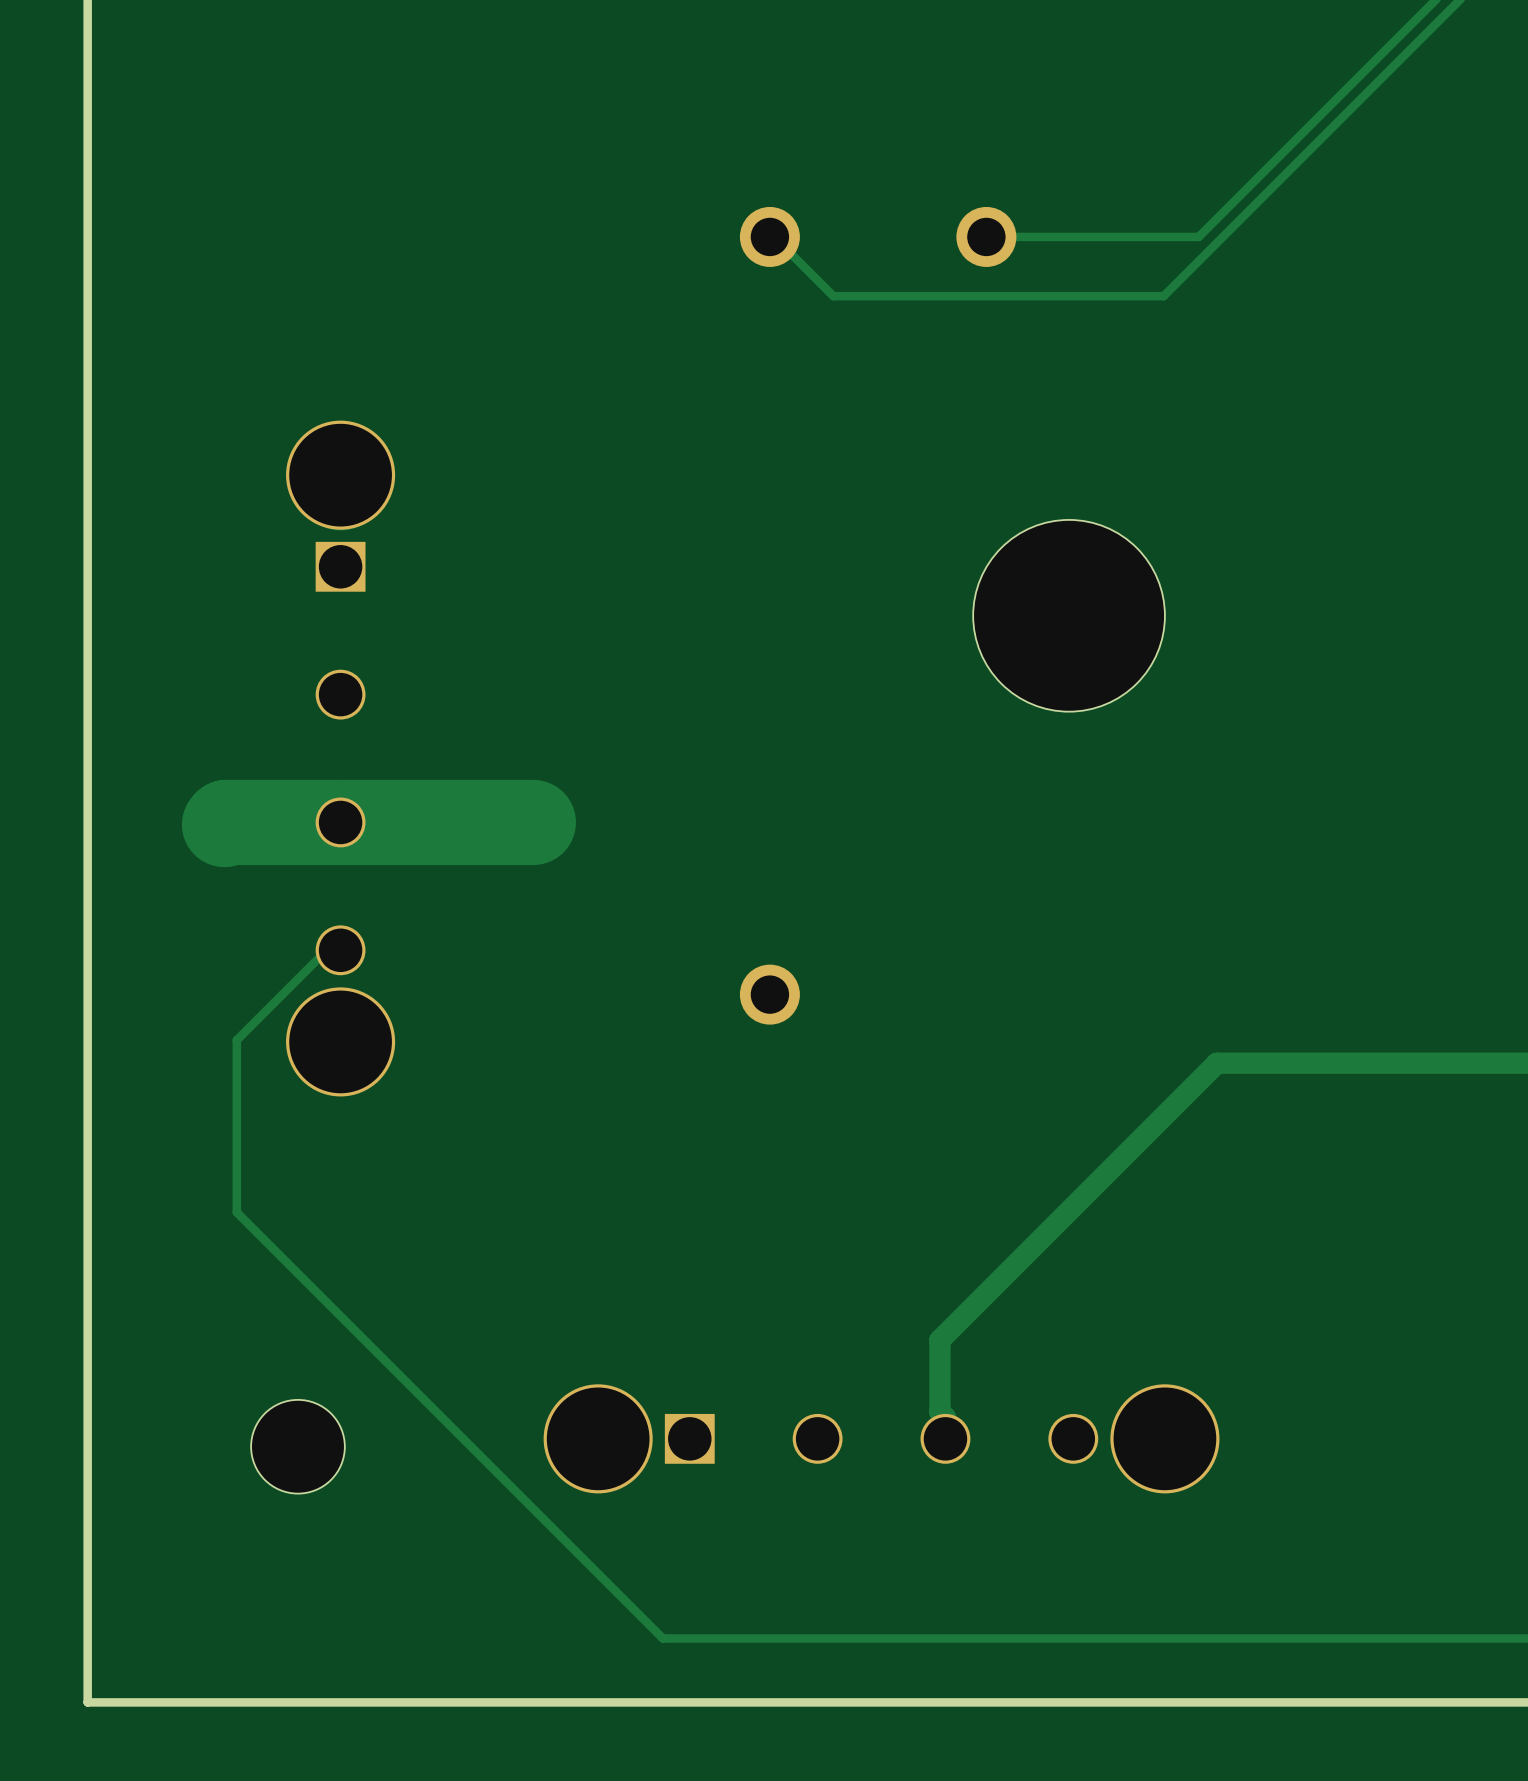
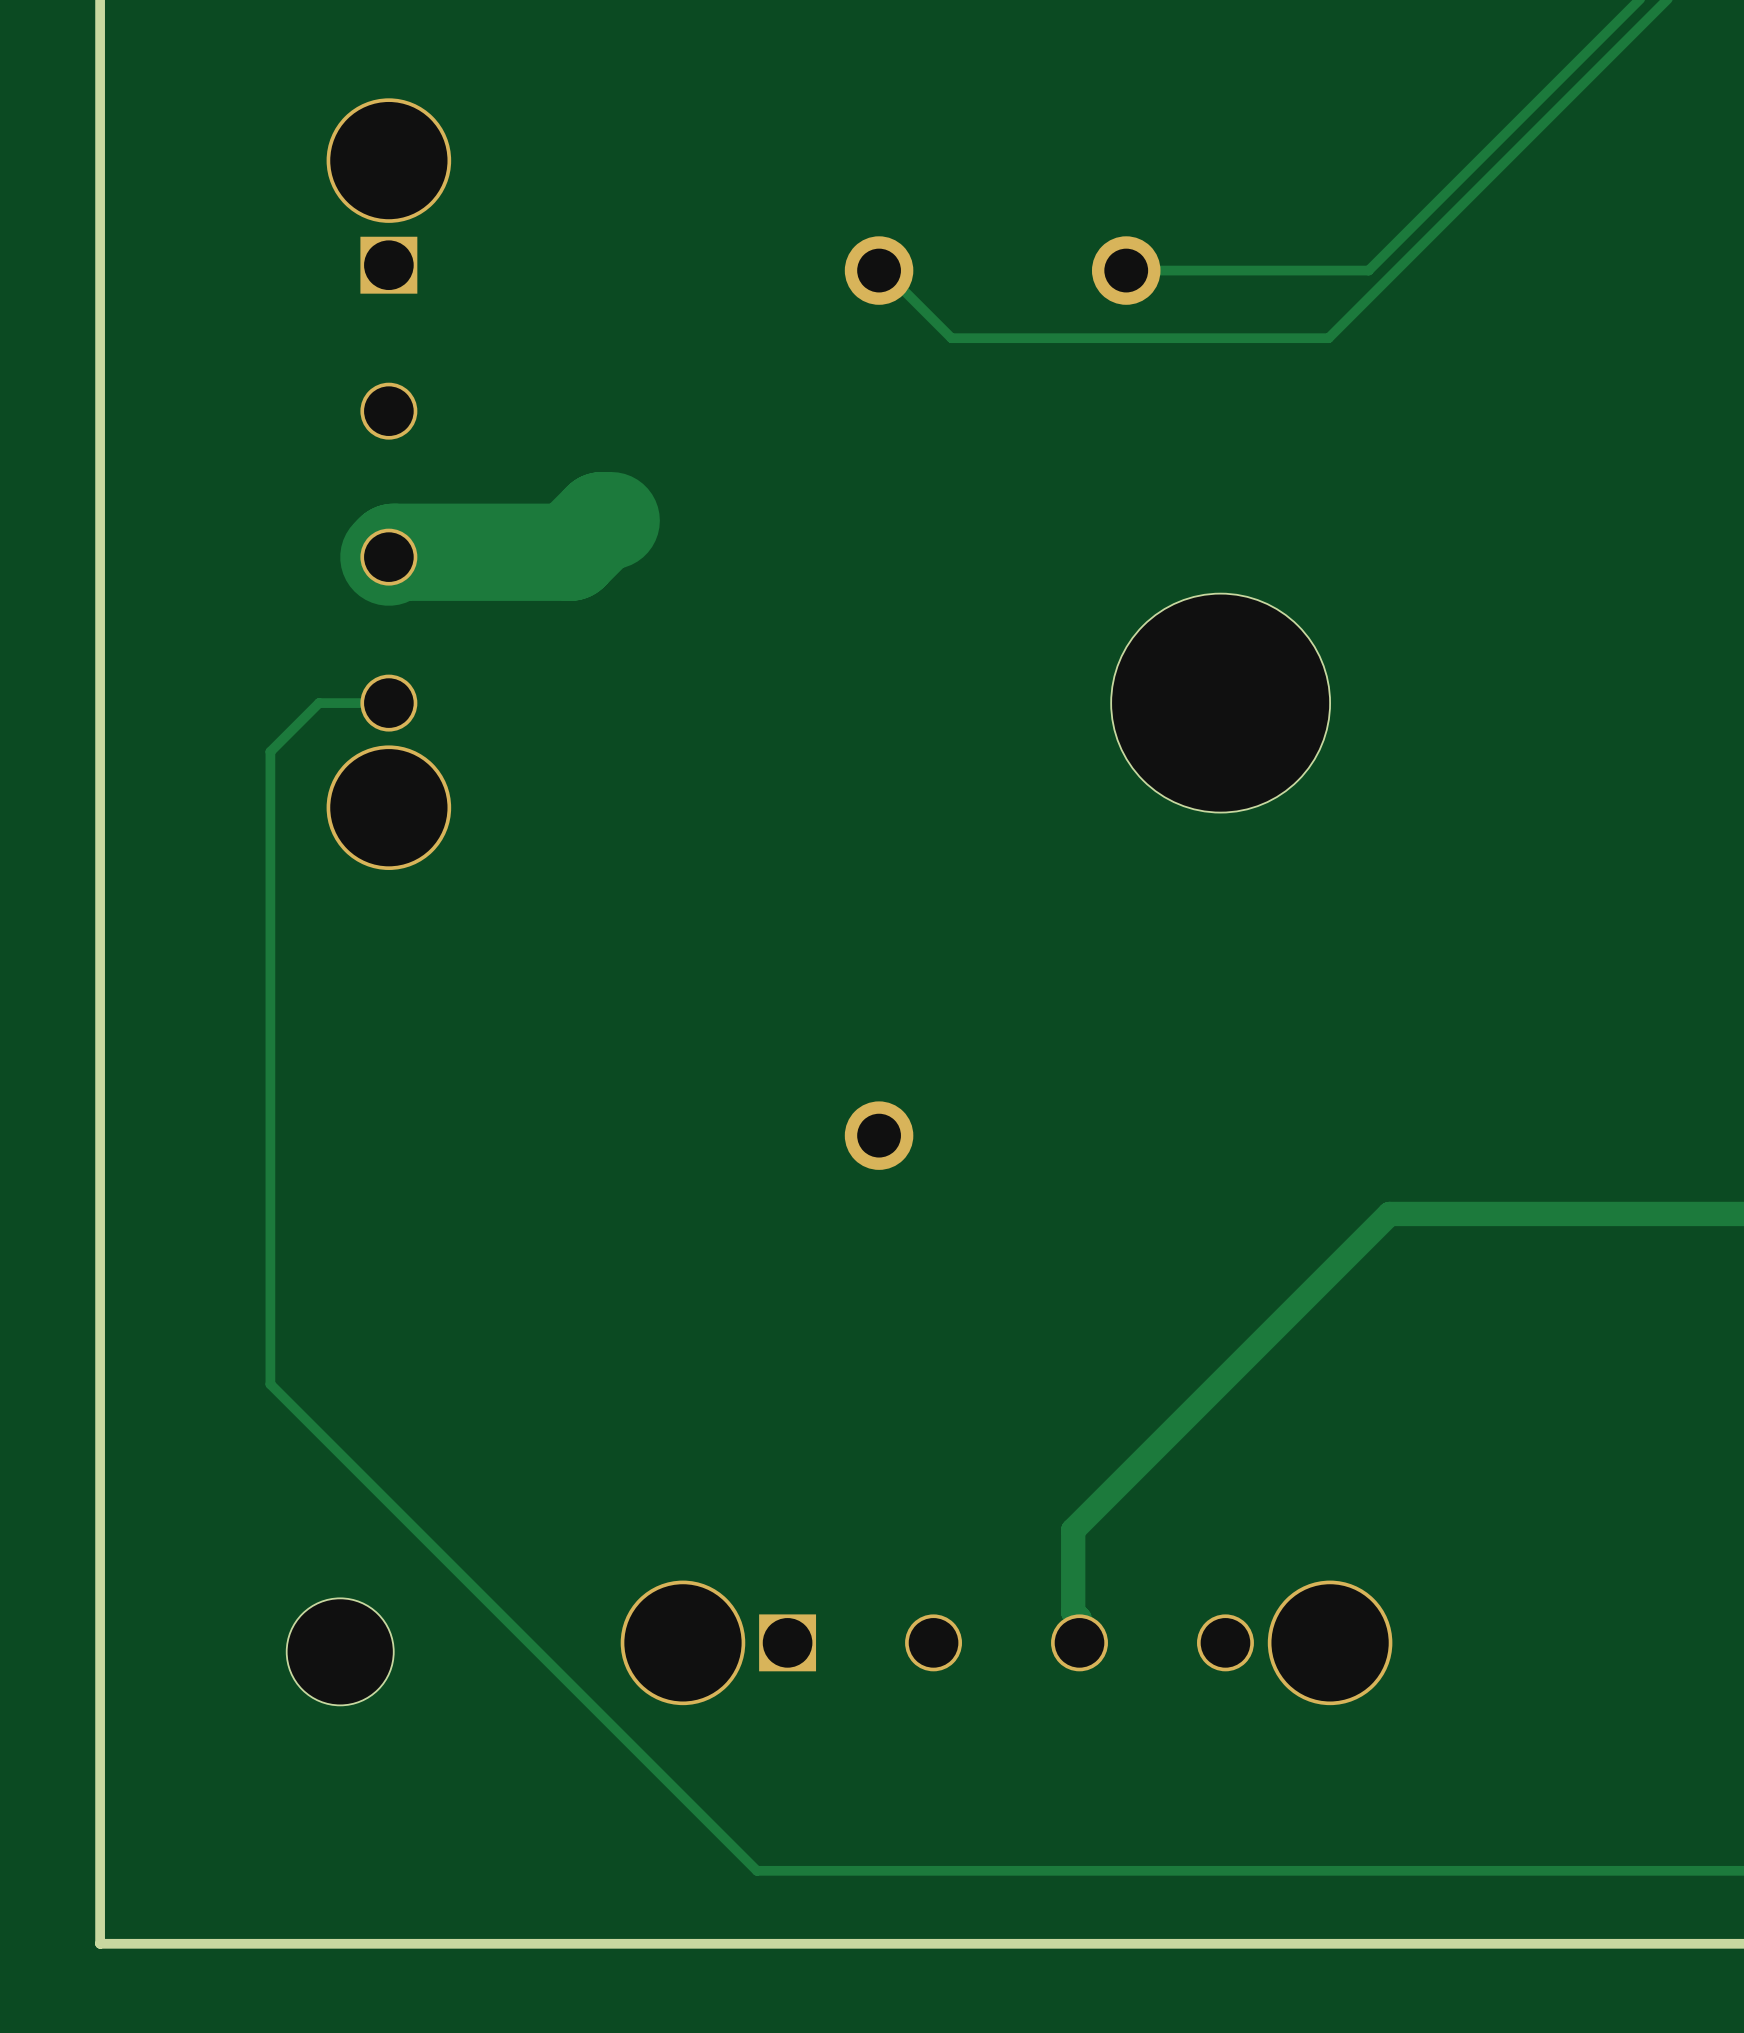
track: none -> (611, 520) (601, 520) (570, 552) (393, 552)
part position: (340, 758) -> (388, 484)
track: (533, 822) (226, 822) (224, 824) -> none
track: (340, 950) (326, 950) (236, 1040) -> (388, 703) (319, 703) (270, 751) (270, 1187)

